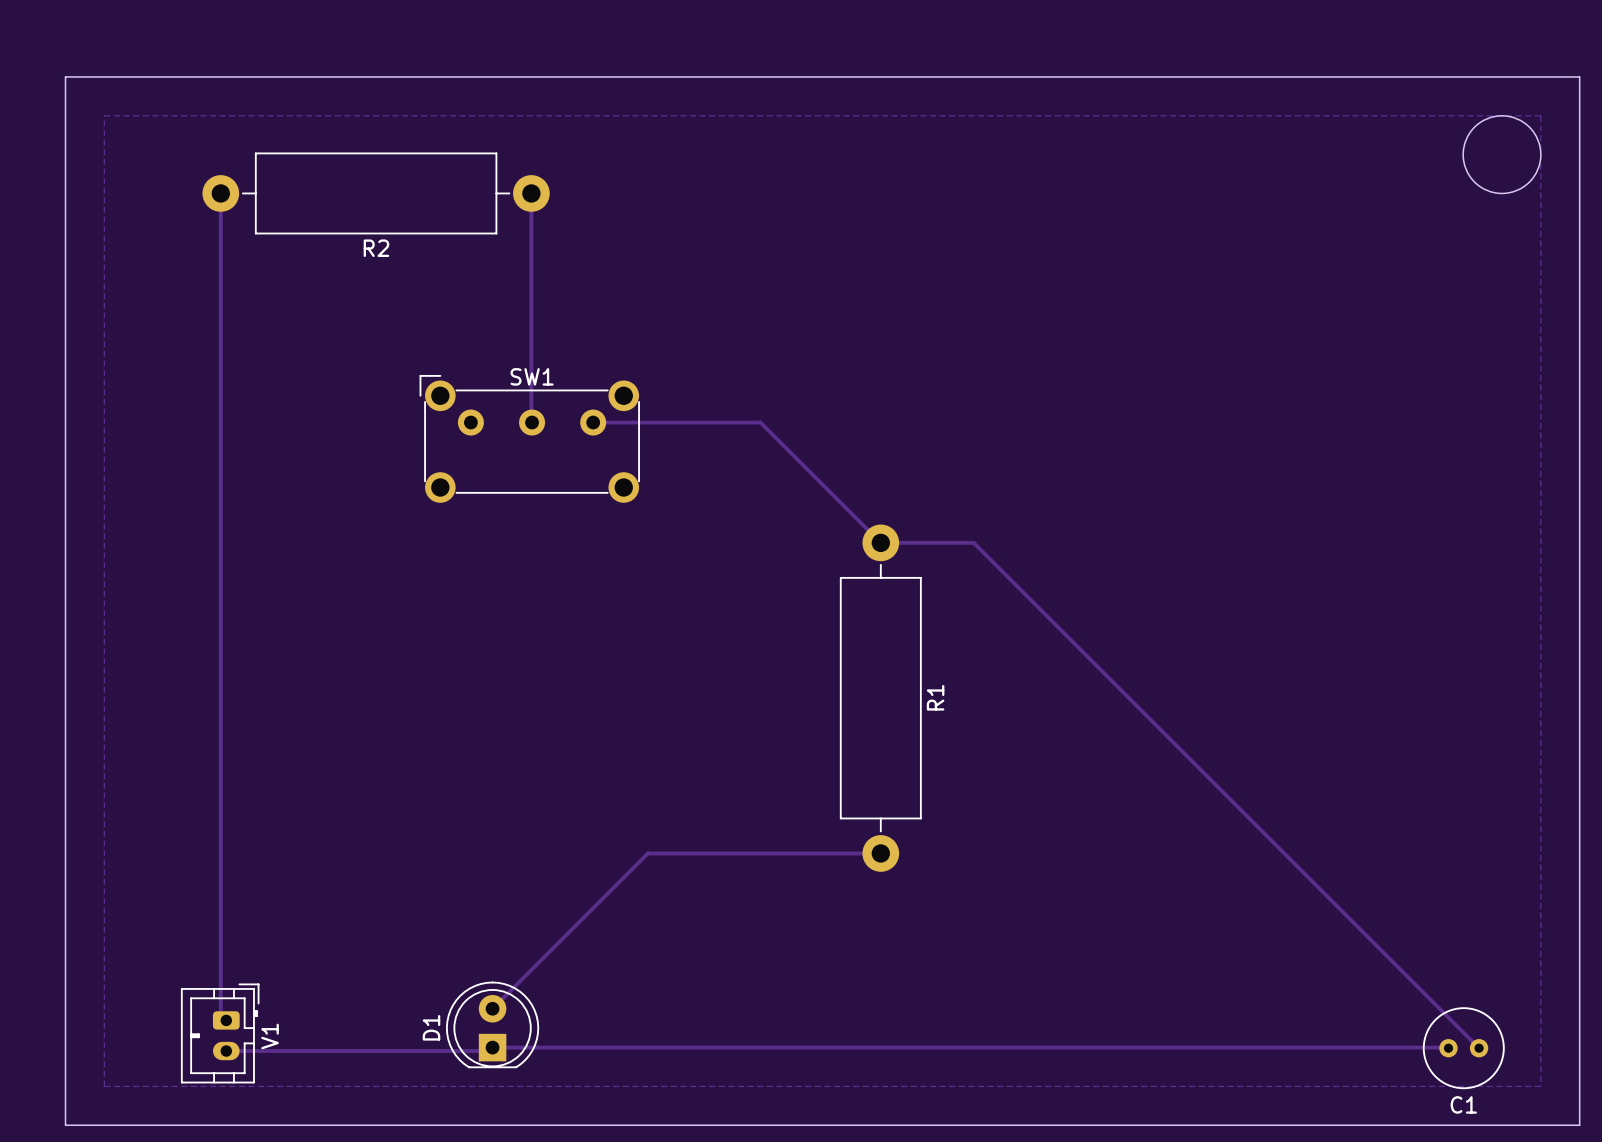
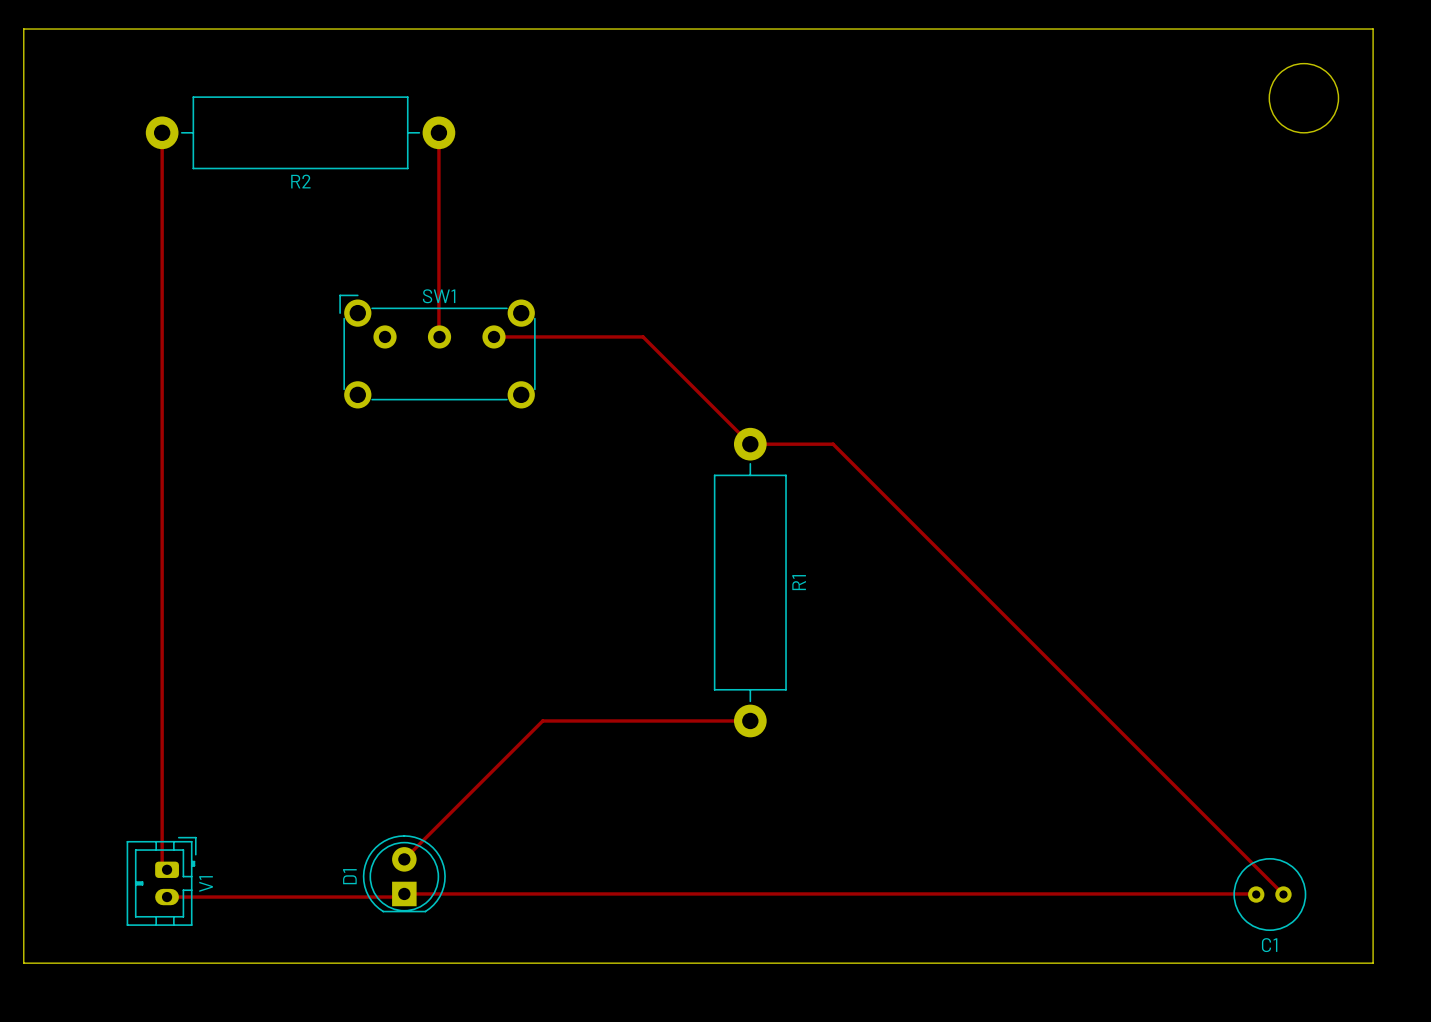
zone outline: (104, 115) (104, 1086) (1540, 1086) (1540, 115) (104, 115) -> none

